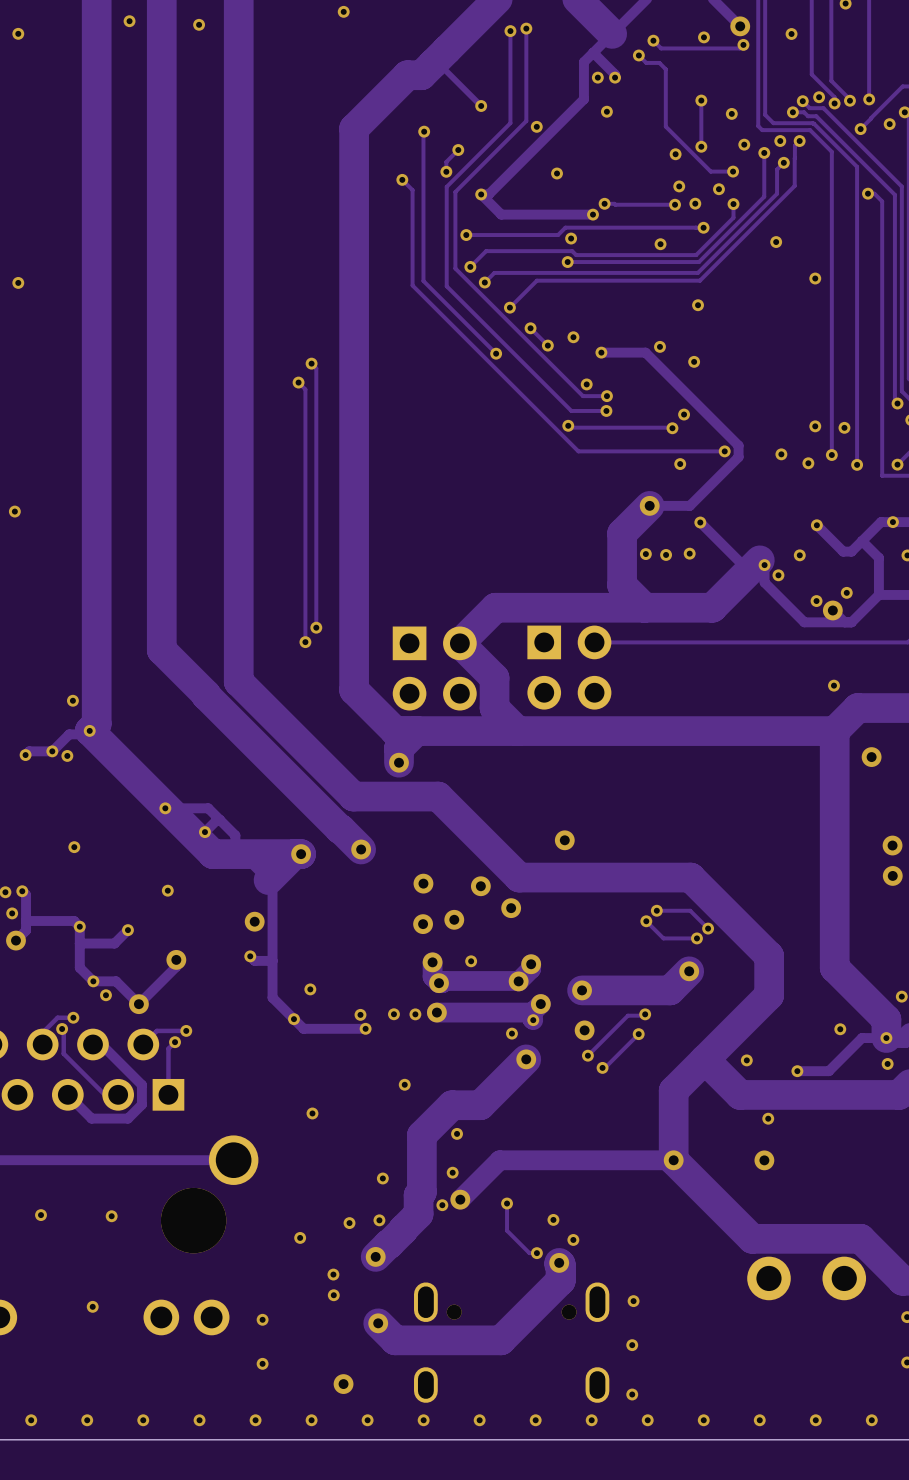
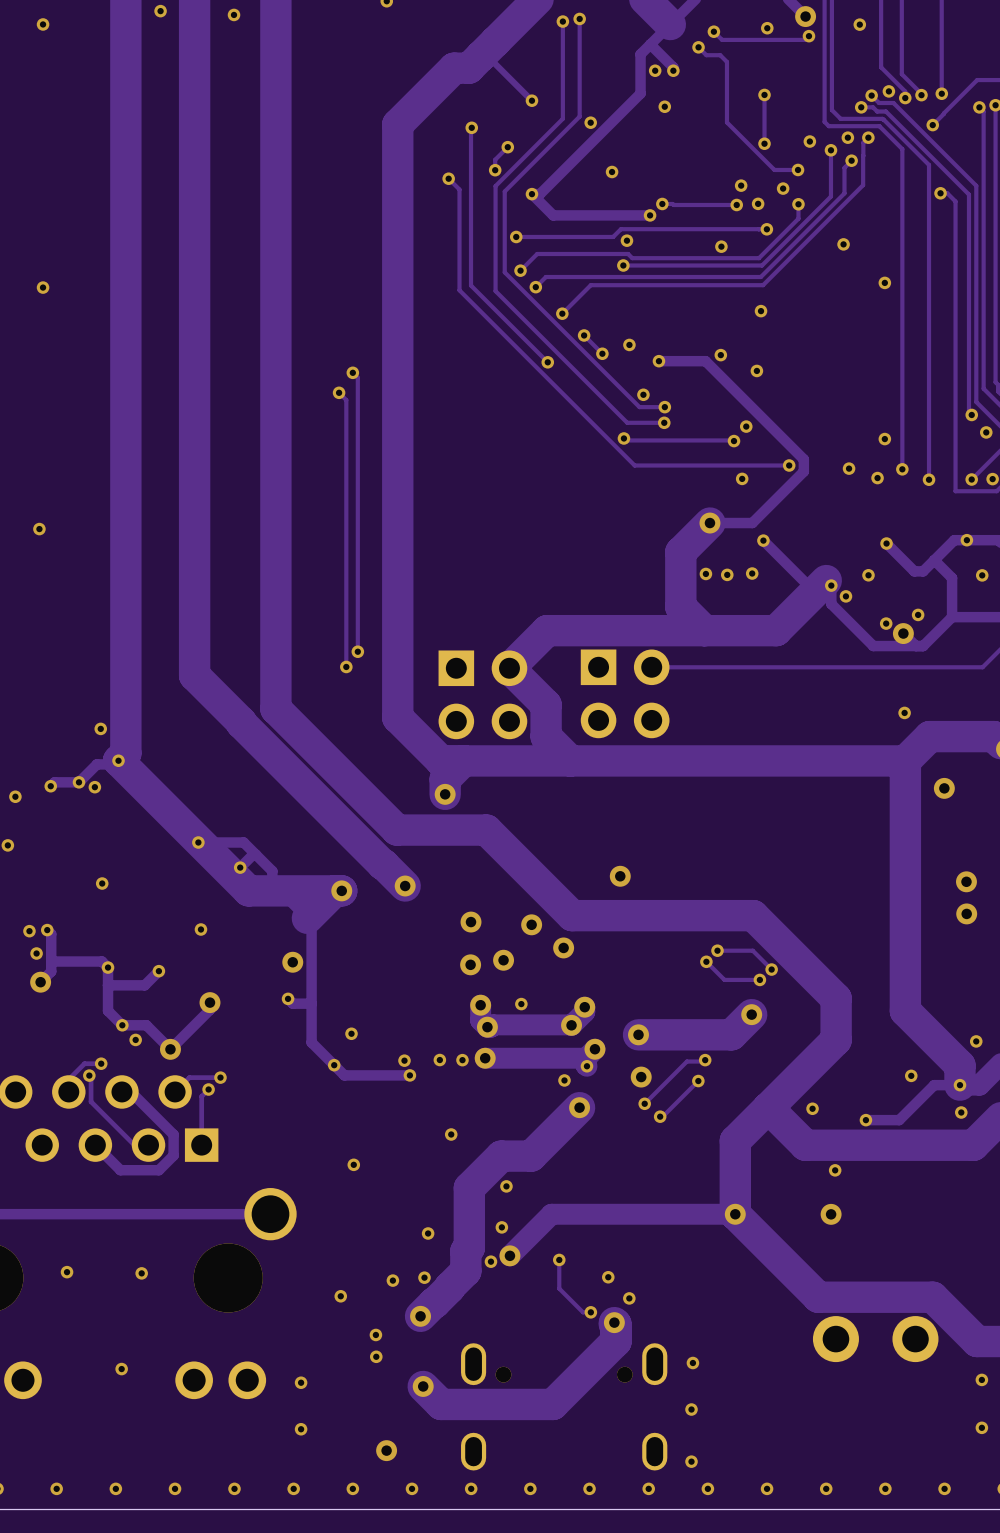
via: (731, 113) -> none
via: (889, 124) -> none
via: (675, 154) -> none
via: (844, 427) -> none

